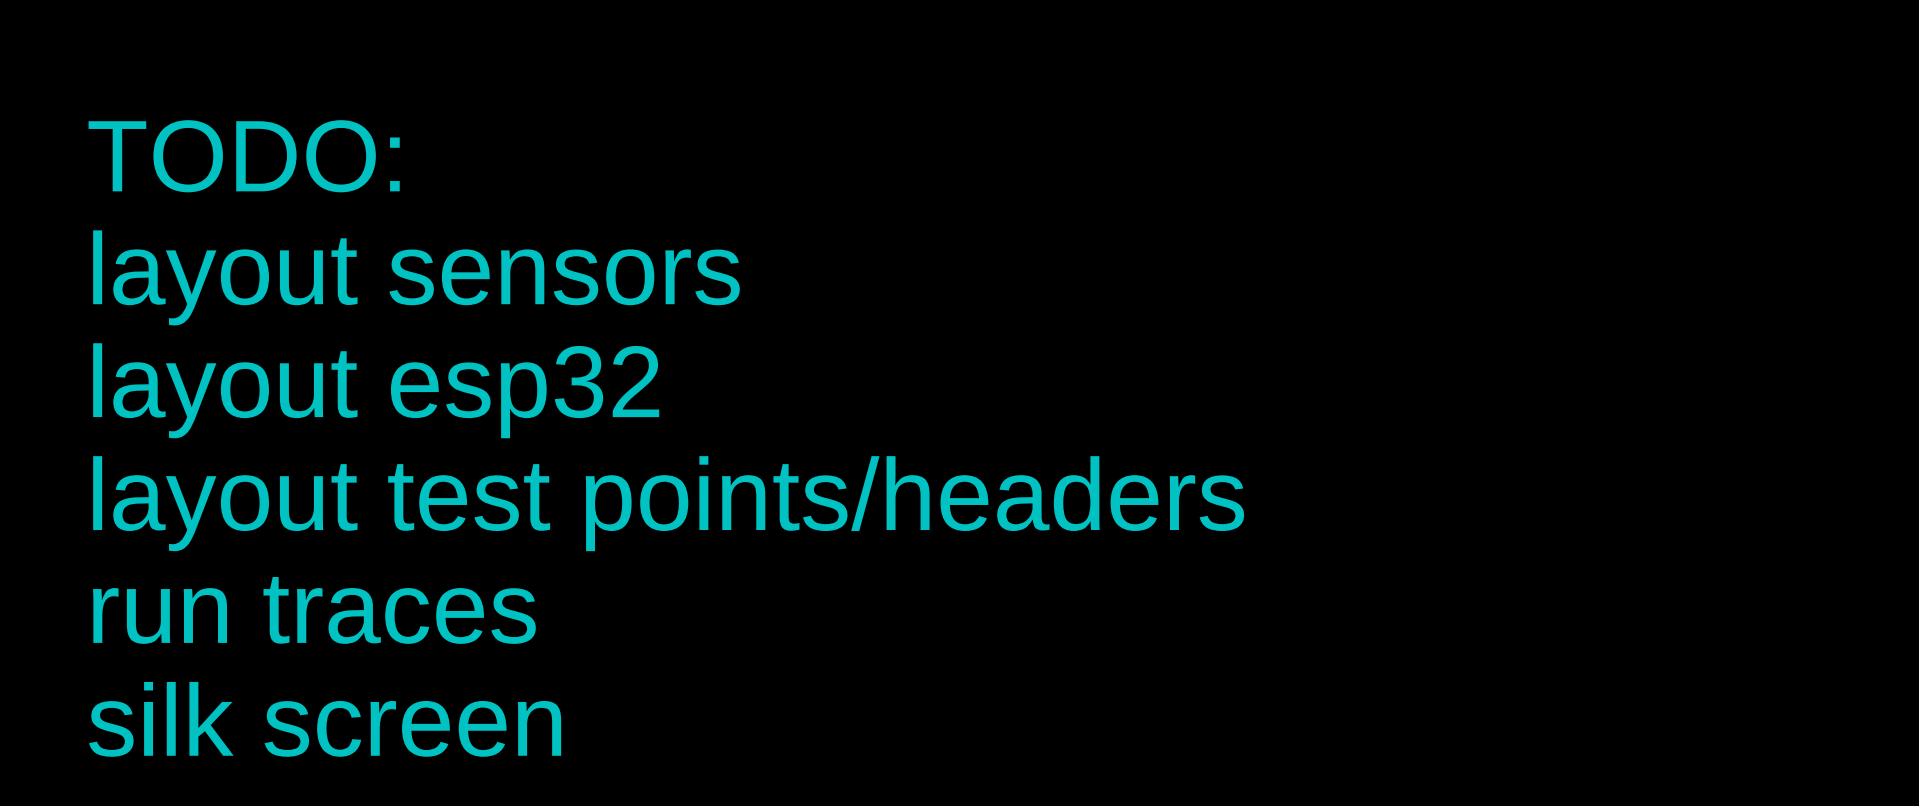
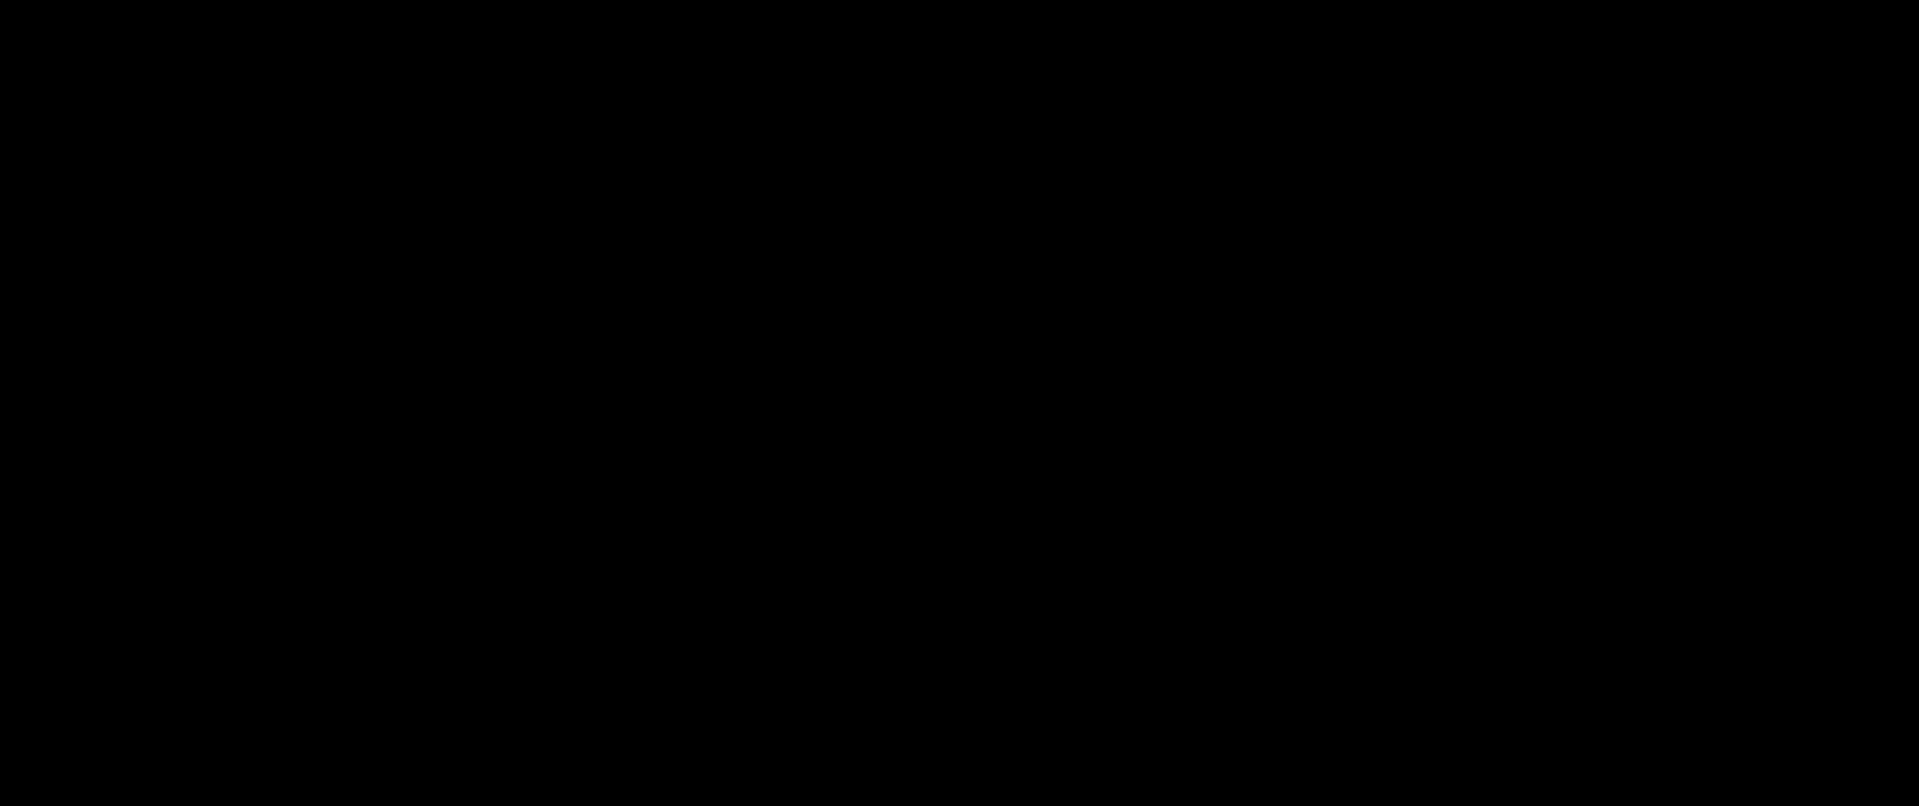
text: TODO: (244, 156) -> none
text: layout sensors (416, 277) -> none
text: layout esp32 (376, 390) -> none
text: layout test points/headers (668, 503) -> none
text: run traces (314, 610) -> none
text: silk screen (325, 719) -> none

